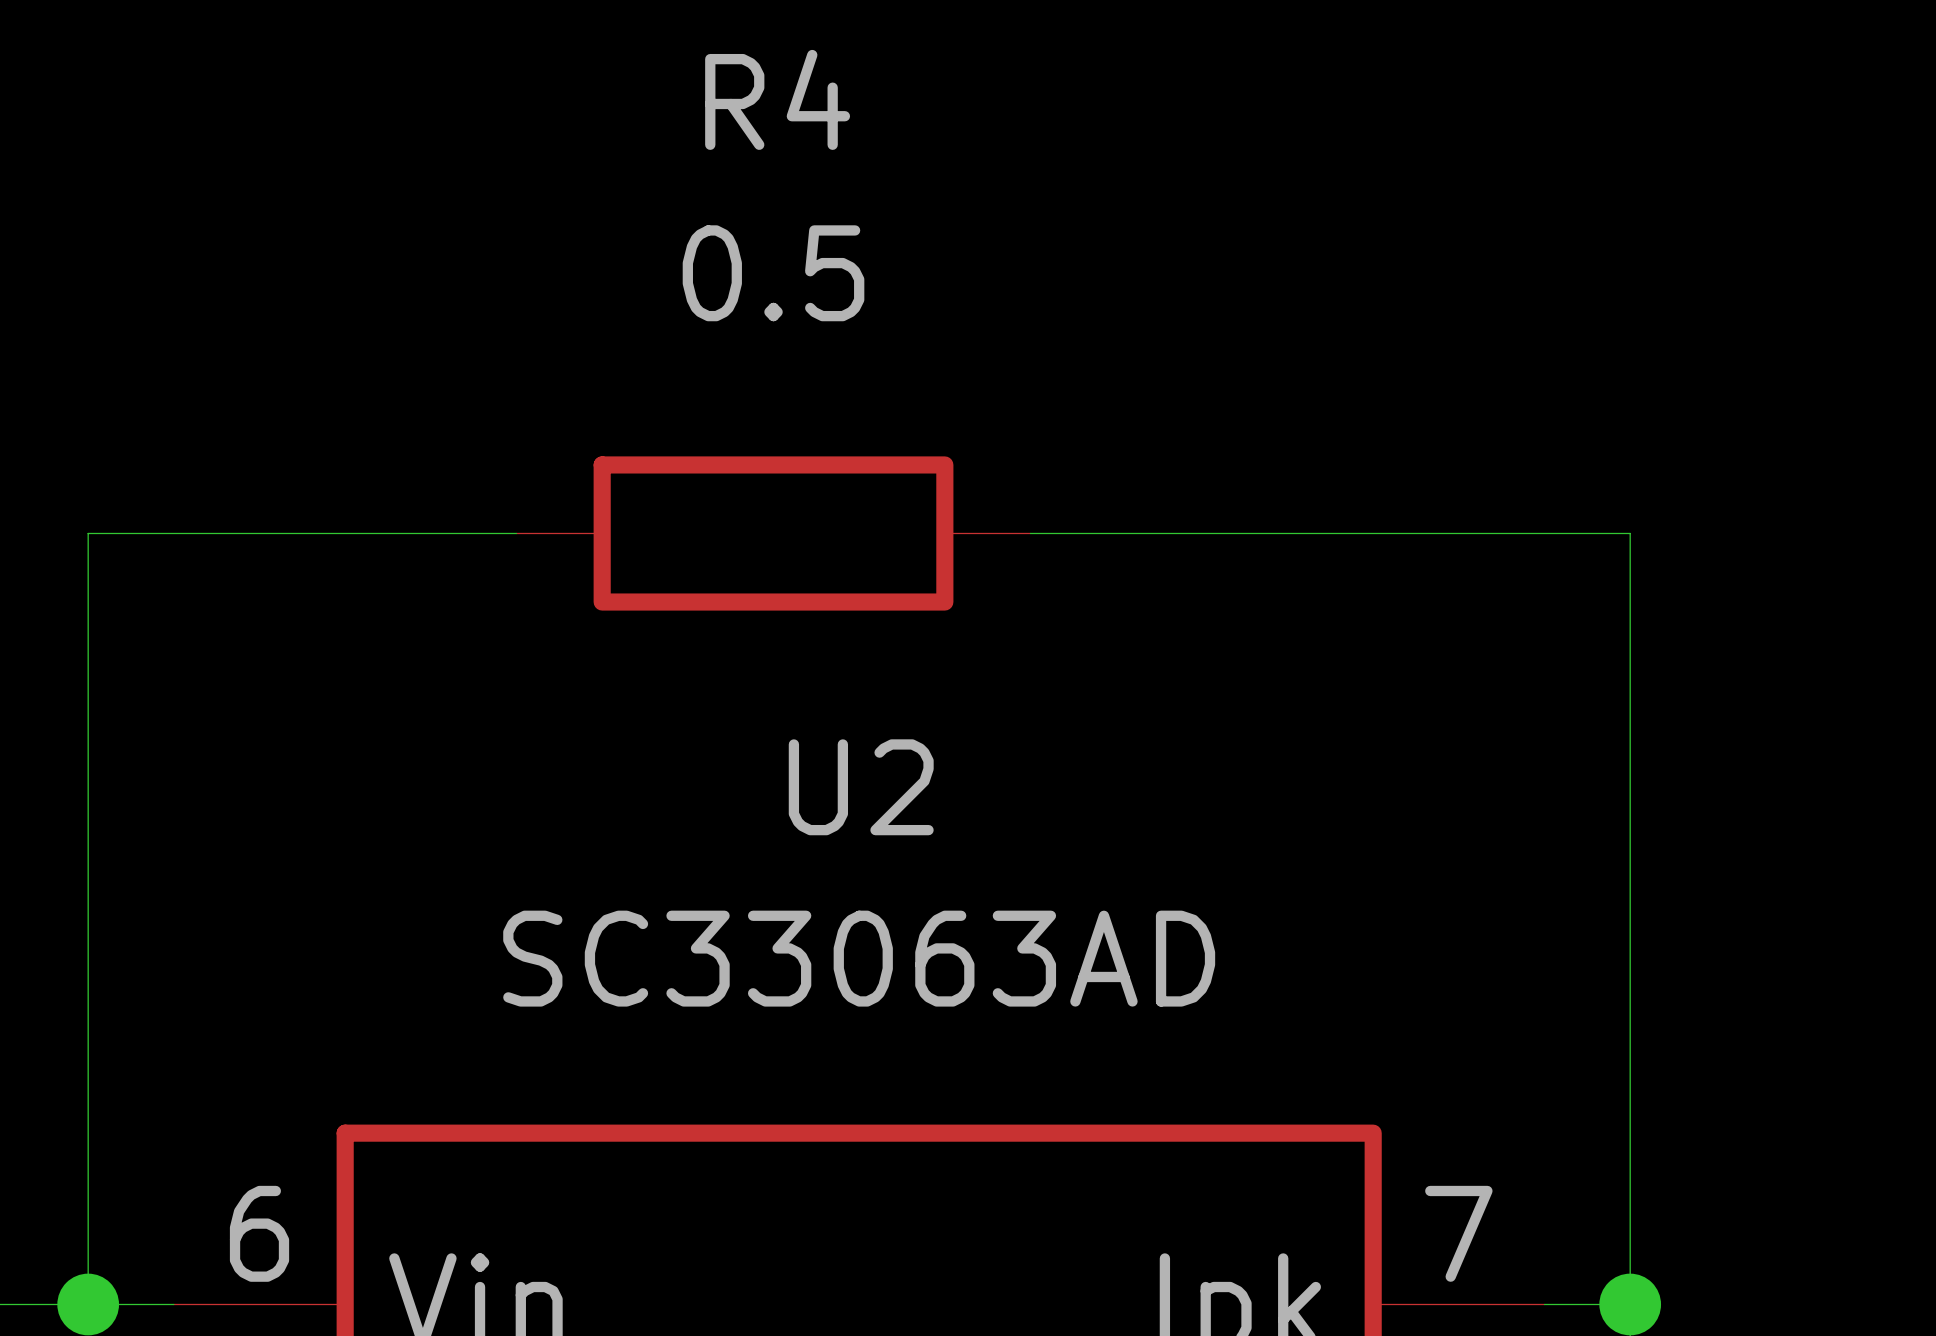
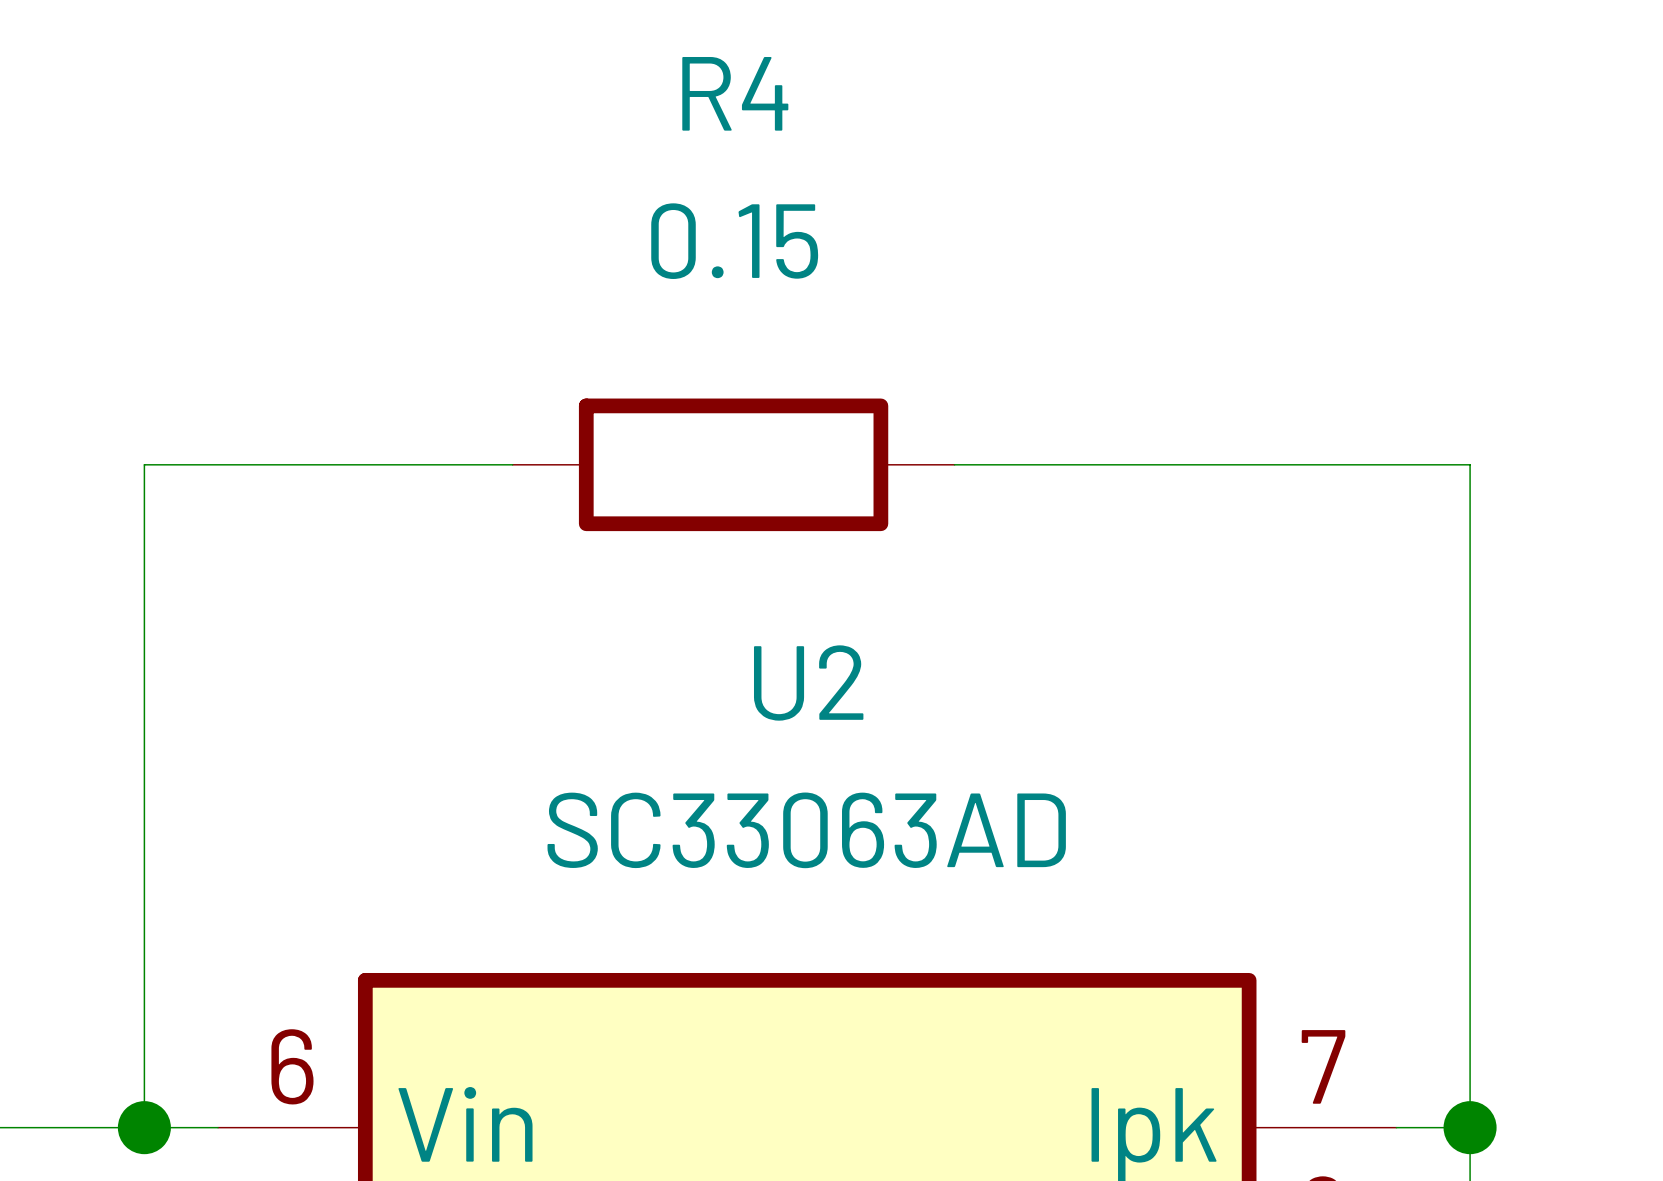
R4 value: 0.5 (773, 273) -> 0.15 (734, 241)

